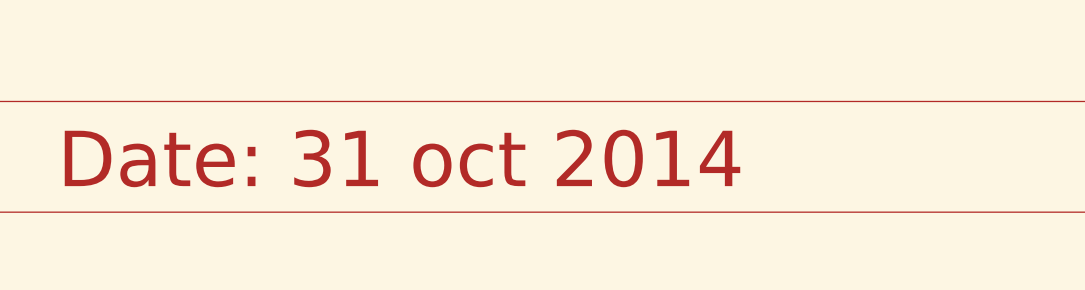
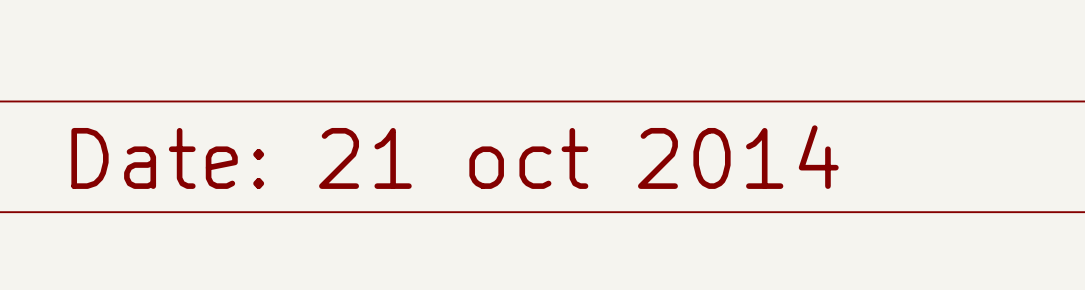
title block: Date: 31 oct 2014 (402, 158) -> Date: 21 oct 2014 (455, 157)

